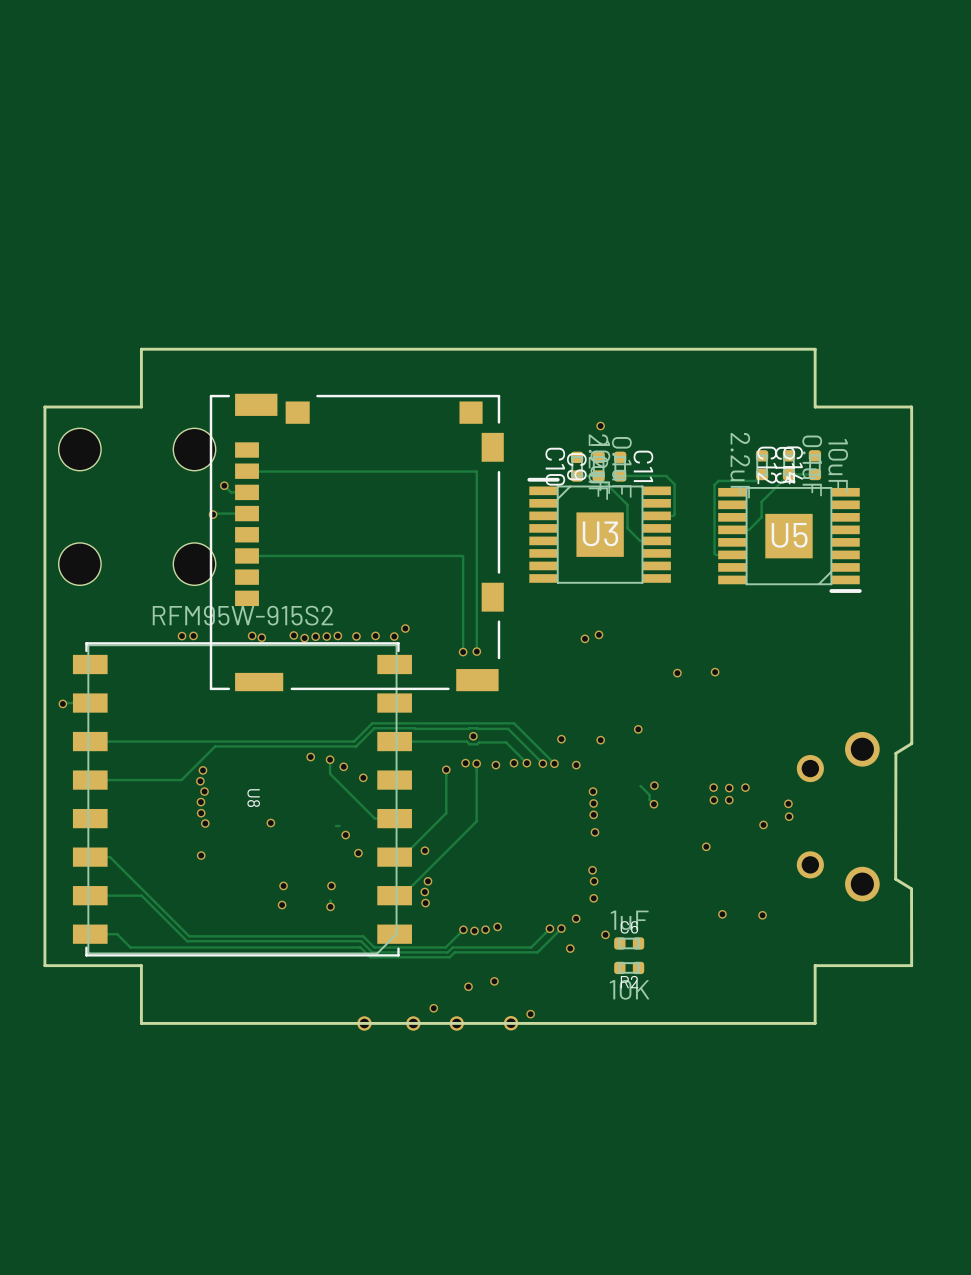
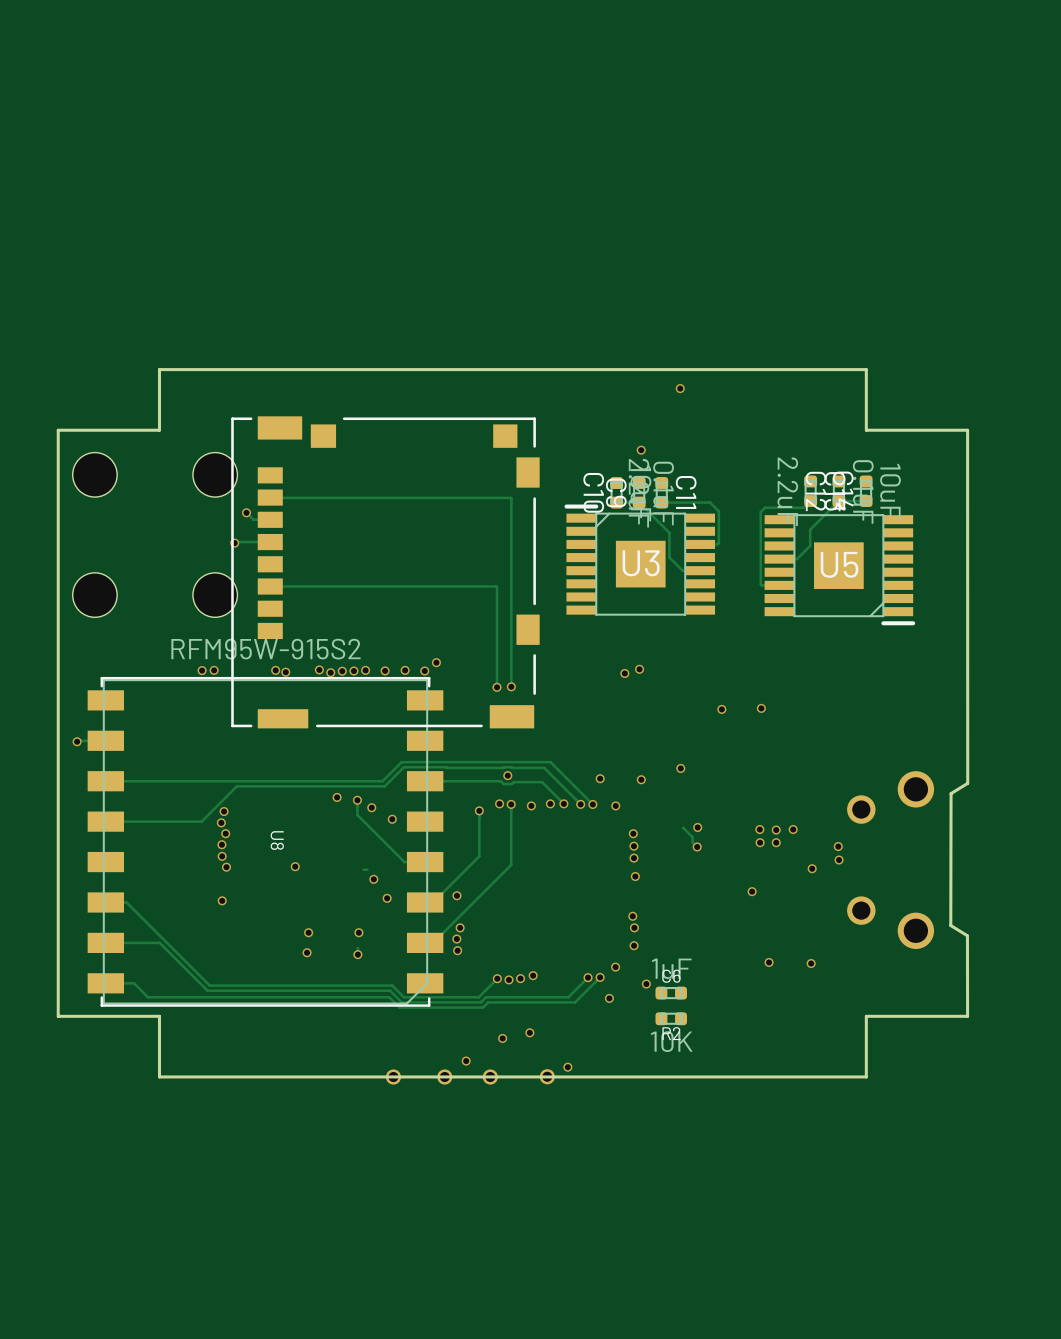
via: none -> (680, 388)

